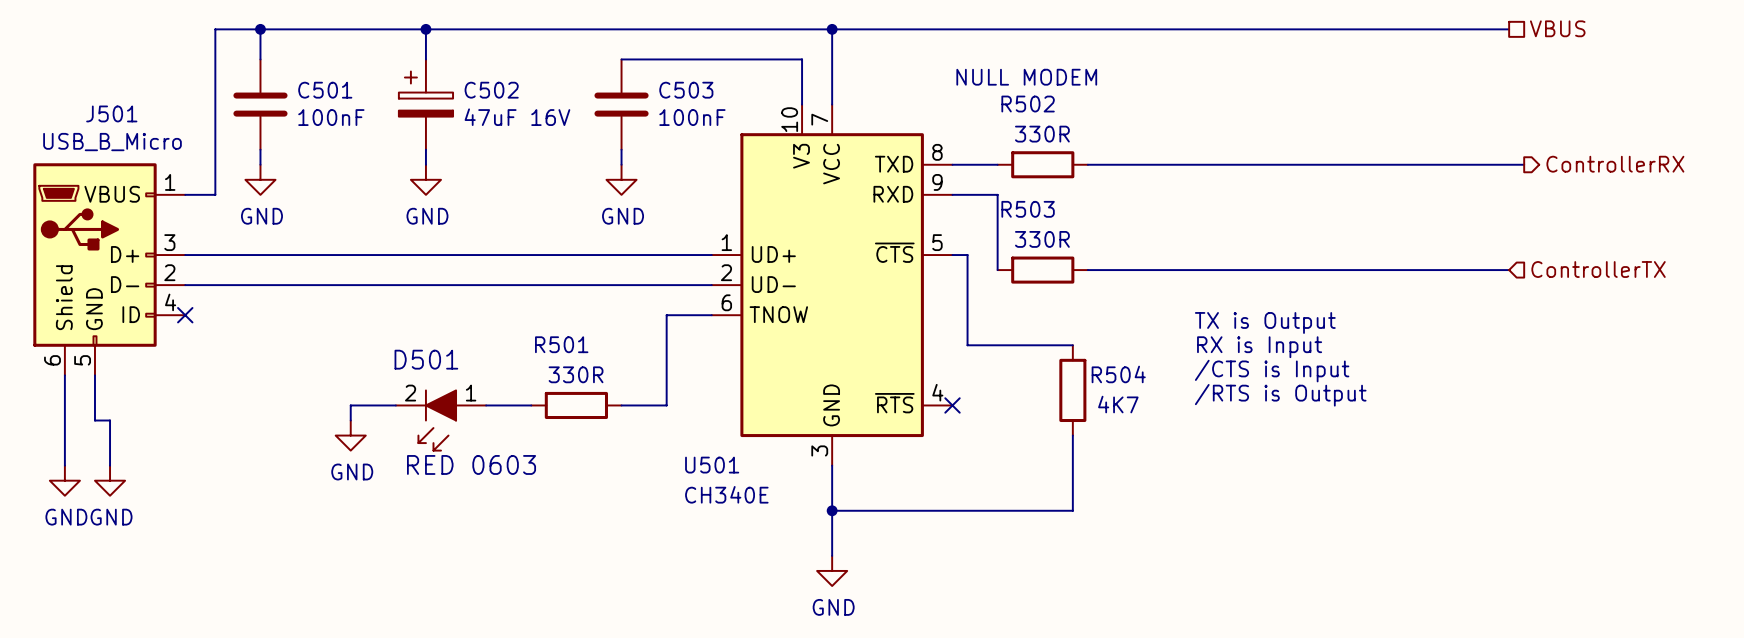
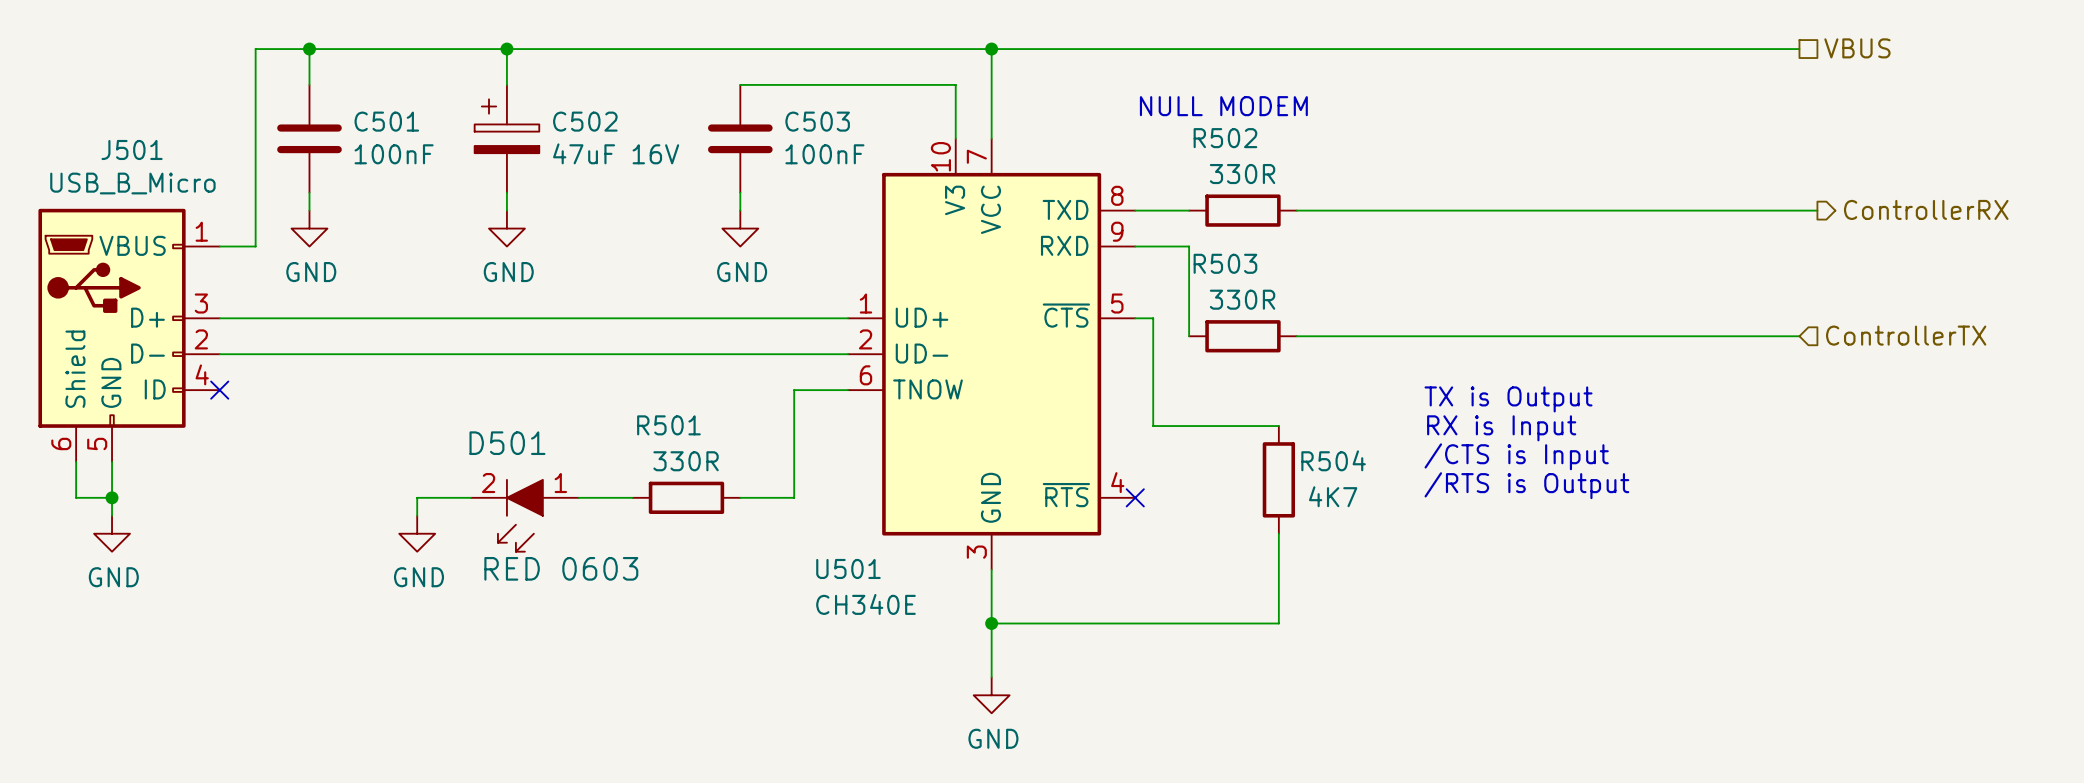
wire: (64, 405) (64, 465) -> (76, 497) (112, 497)
junction: none -> (112, 497)
wire: (94, 420) (110, 420) (110, 465) -> none
power symbol: none -> GND (112, 533)
power symbol: GND (64, 480) -> none
power symbol: GND (110, 480) -> none

